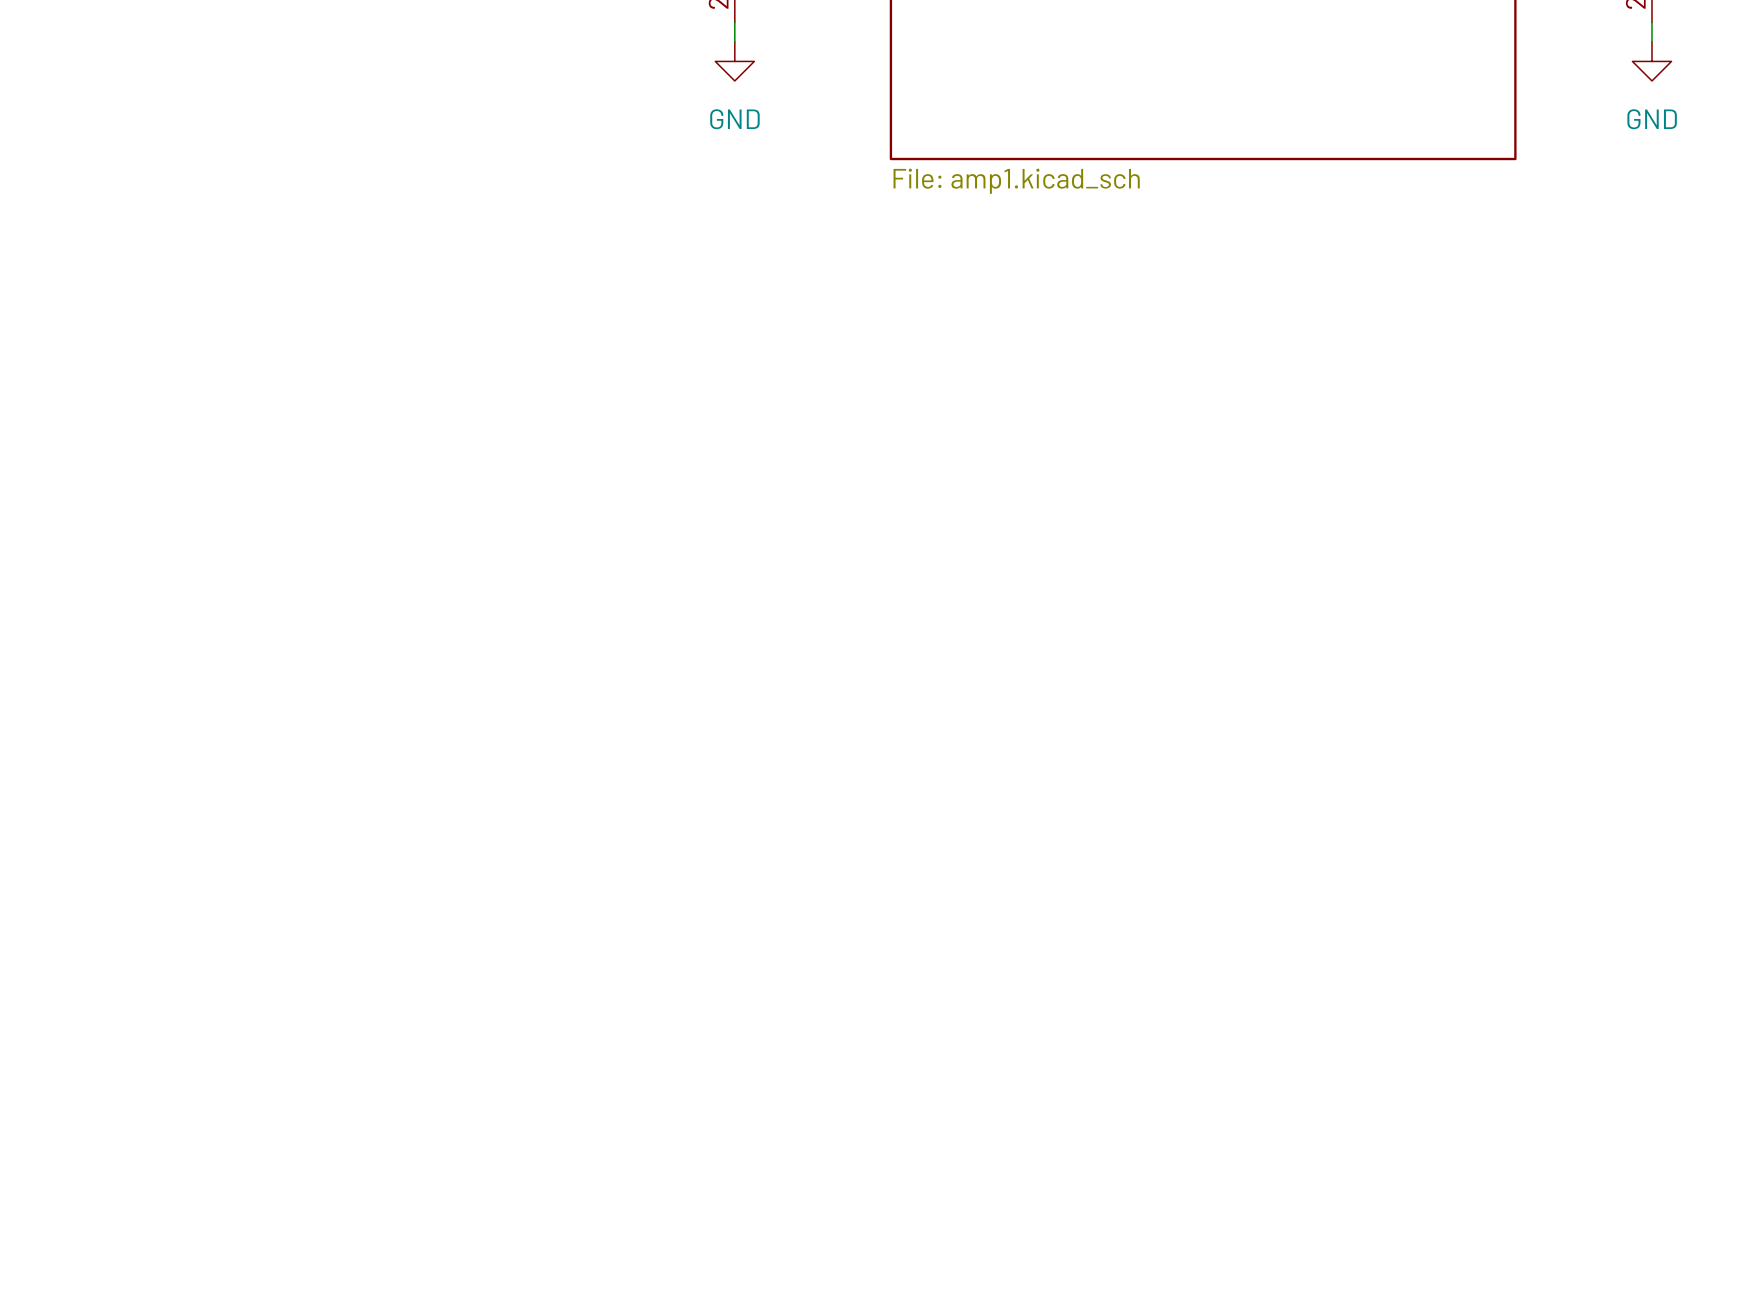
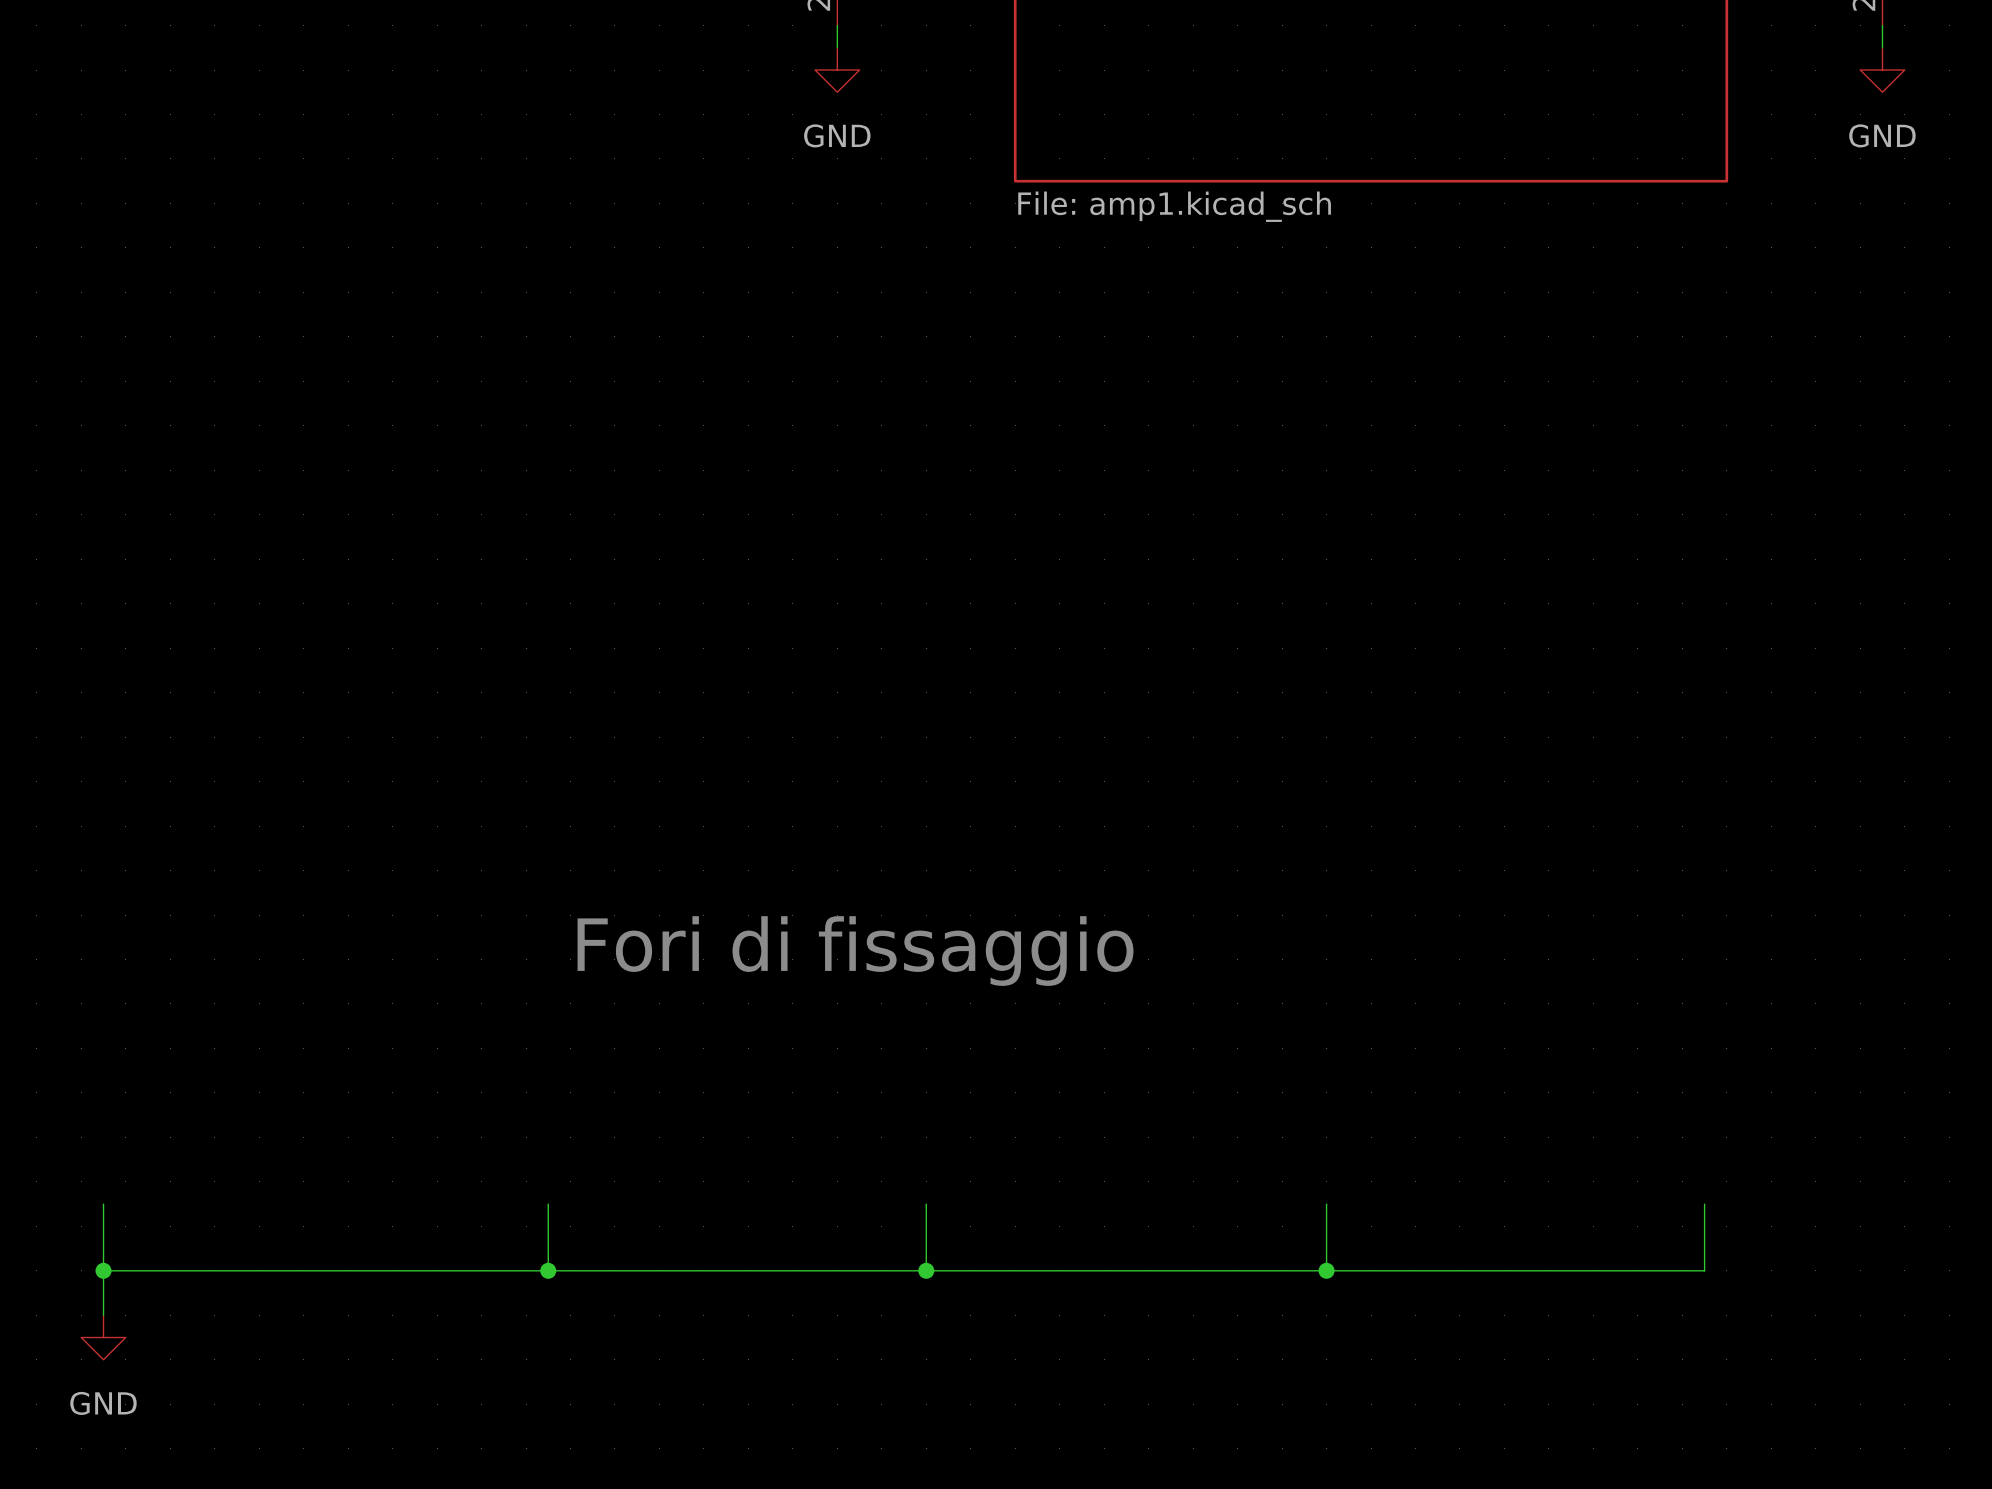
text: none -> Fori di fissaggio (855, 951)
wire: none -> (103, 1204) (103, 1315)
wire: none -> (548, 1204) (548, 1270)
wire: none -> (926, 1204) (926, 1270)
wire: none -> (1326, 1204) (1326, 1270)
wire: none -> (1704, 1204) (1704, 1270) (103, 1270)
junction: none -> (103, 1270)
junction: none -> (548, 1270)
junction: none -> (926, 1270)
junction: none -> (1326, 1270)
power symbol: none -> GND (103, 1337)

